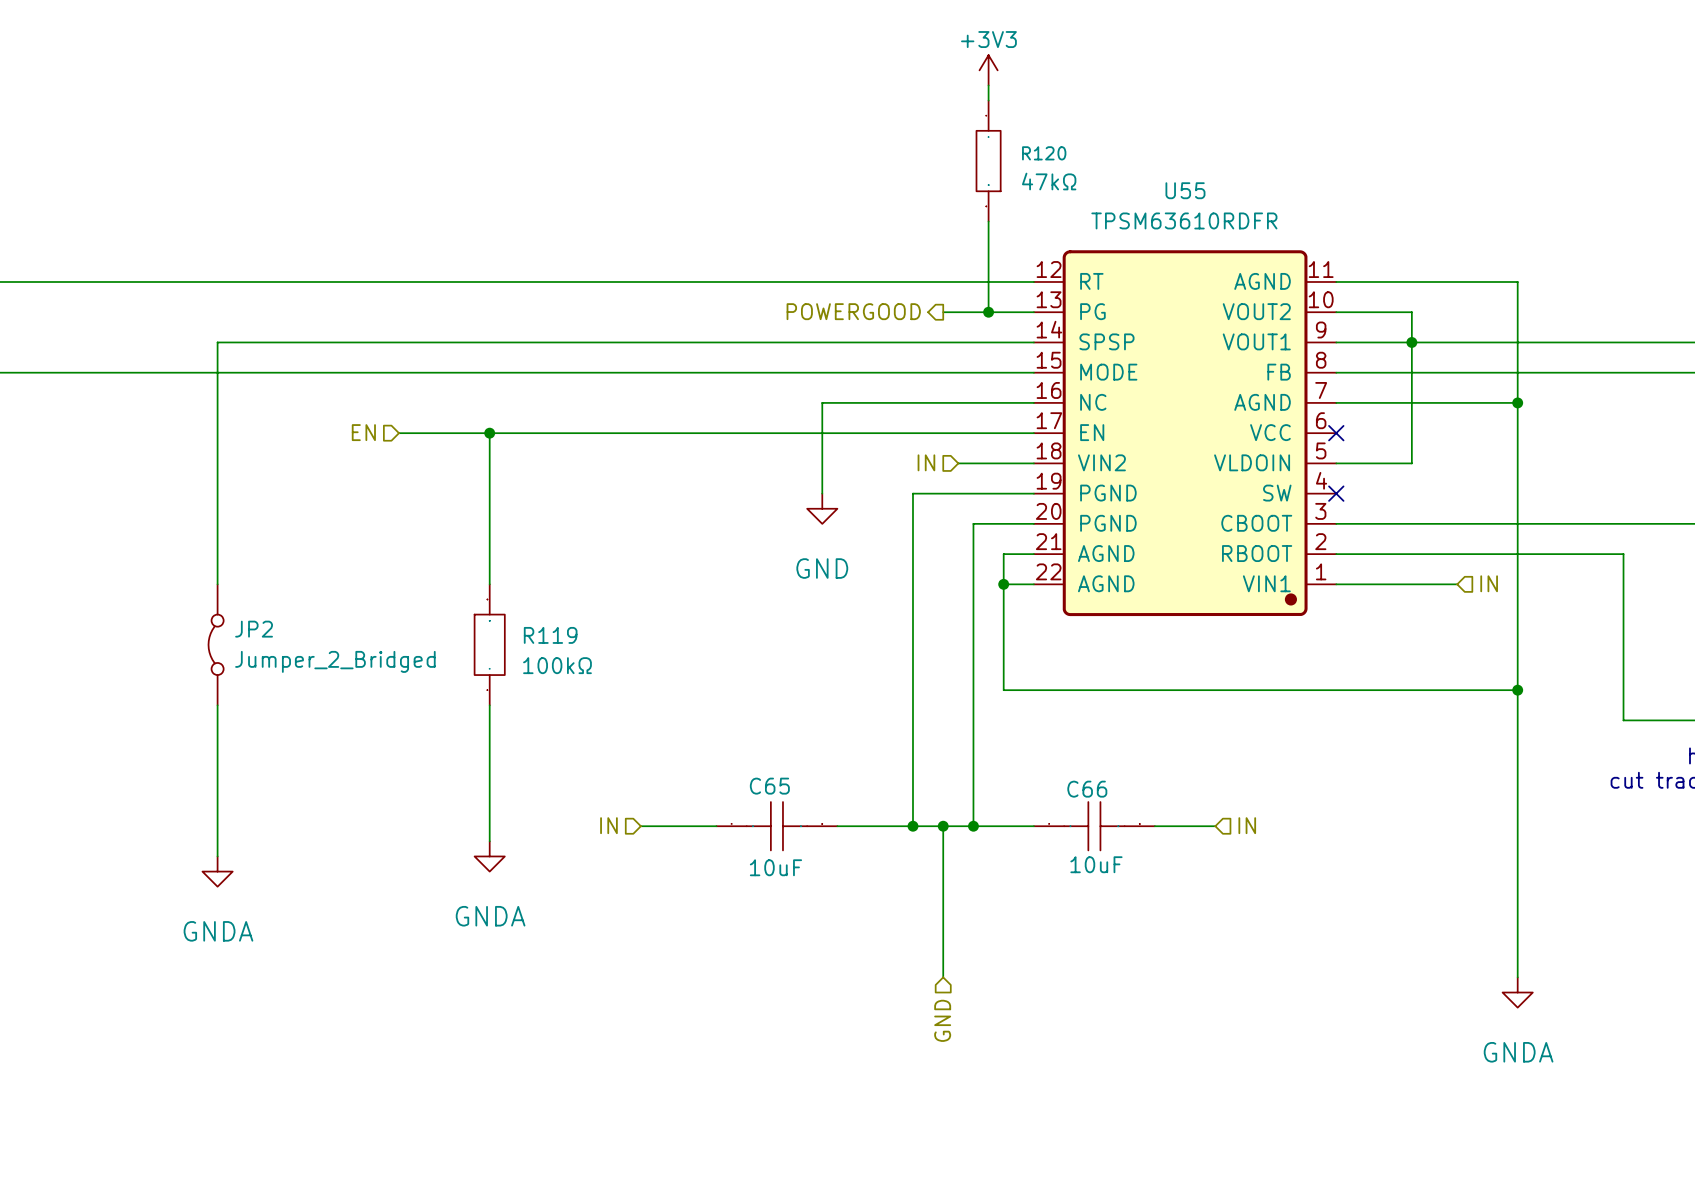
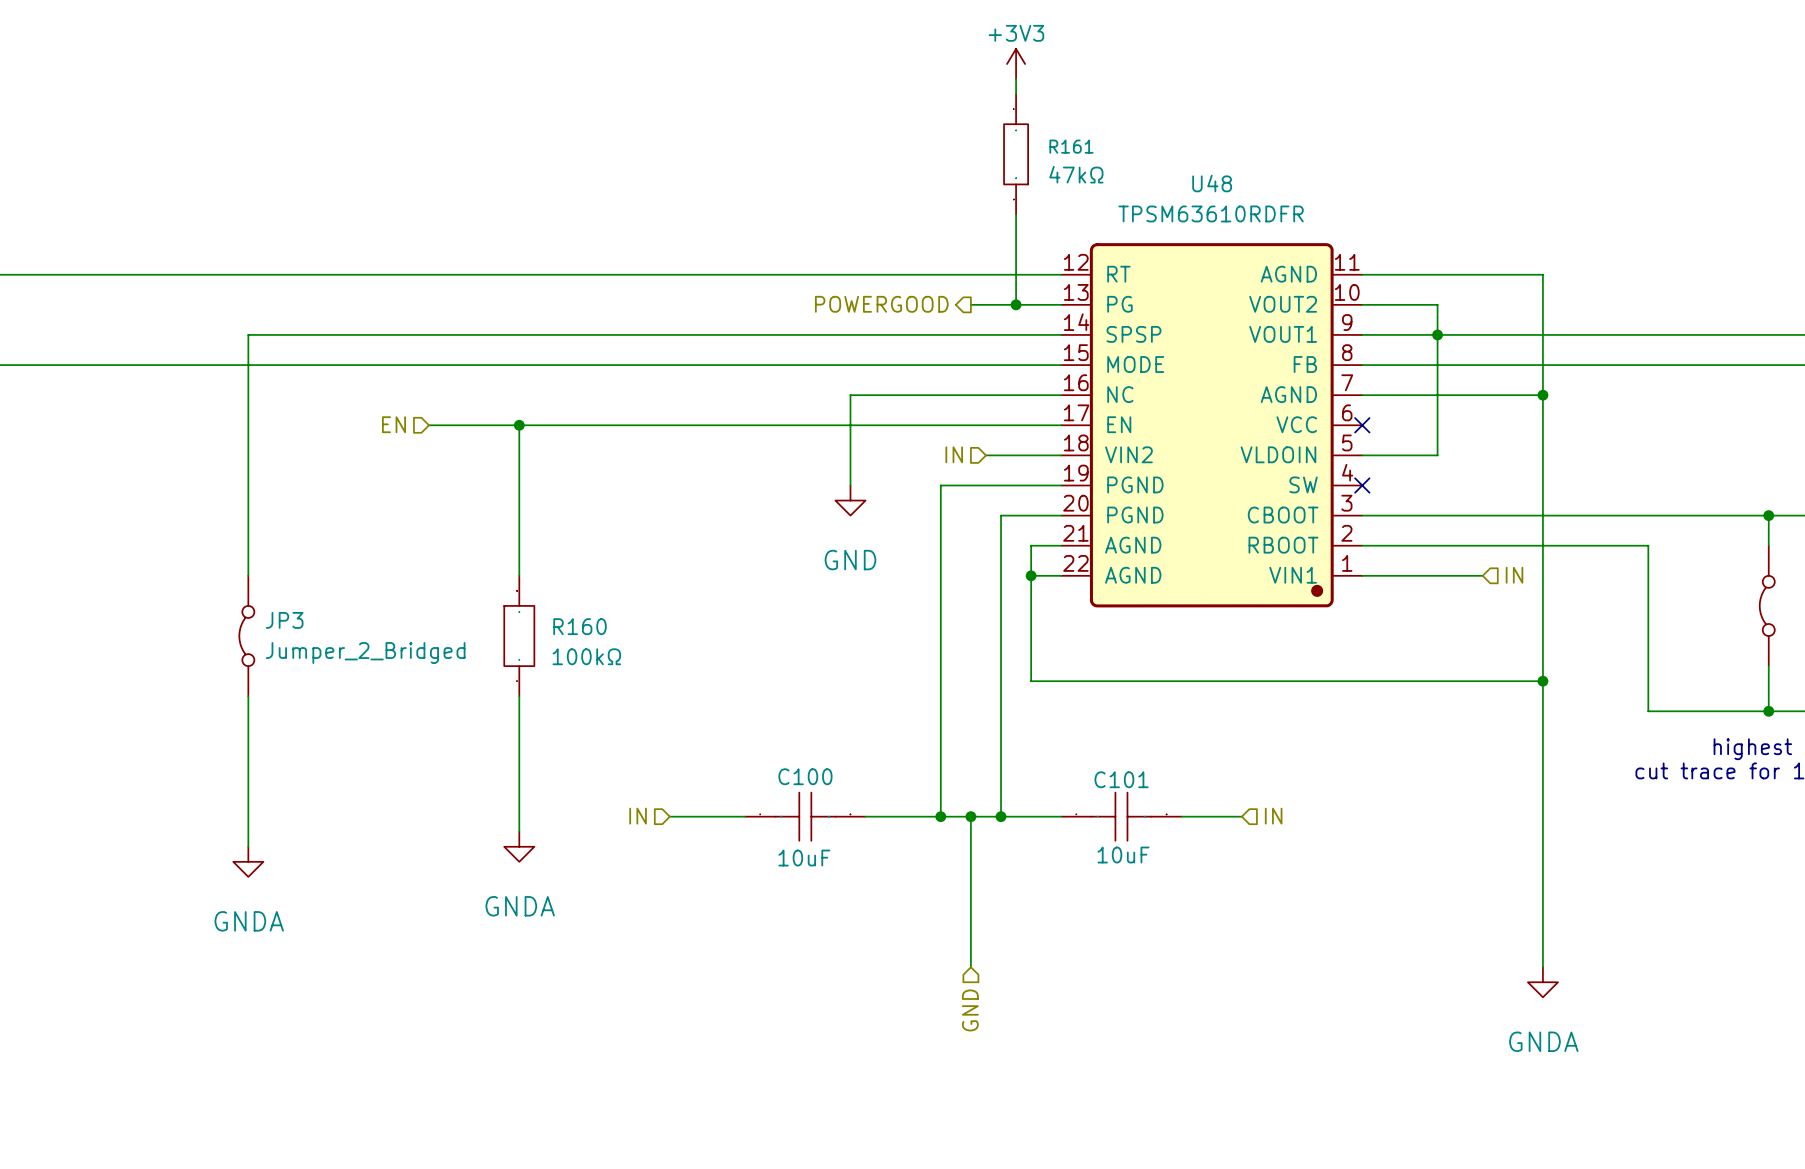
R120 name: R120 (1044, 153) -> R161 (1071, 146)
U55 name: U55 (1185, 190) -> U48 (1212, 183)
JP2 name: JP2 (254, 629) -> JP3 (284, 620)
R119 name: R119 (550, 635) -> R160 (579, 626)
C65 name: C65 (769, 786) -> C100 (805, 776)
C66 name: C66 (1087, 789) -> C101 (1121, 779)

